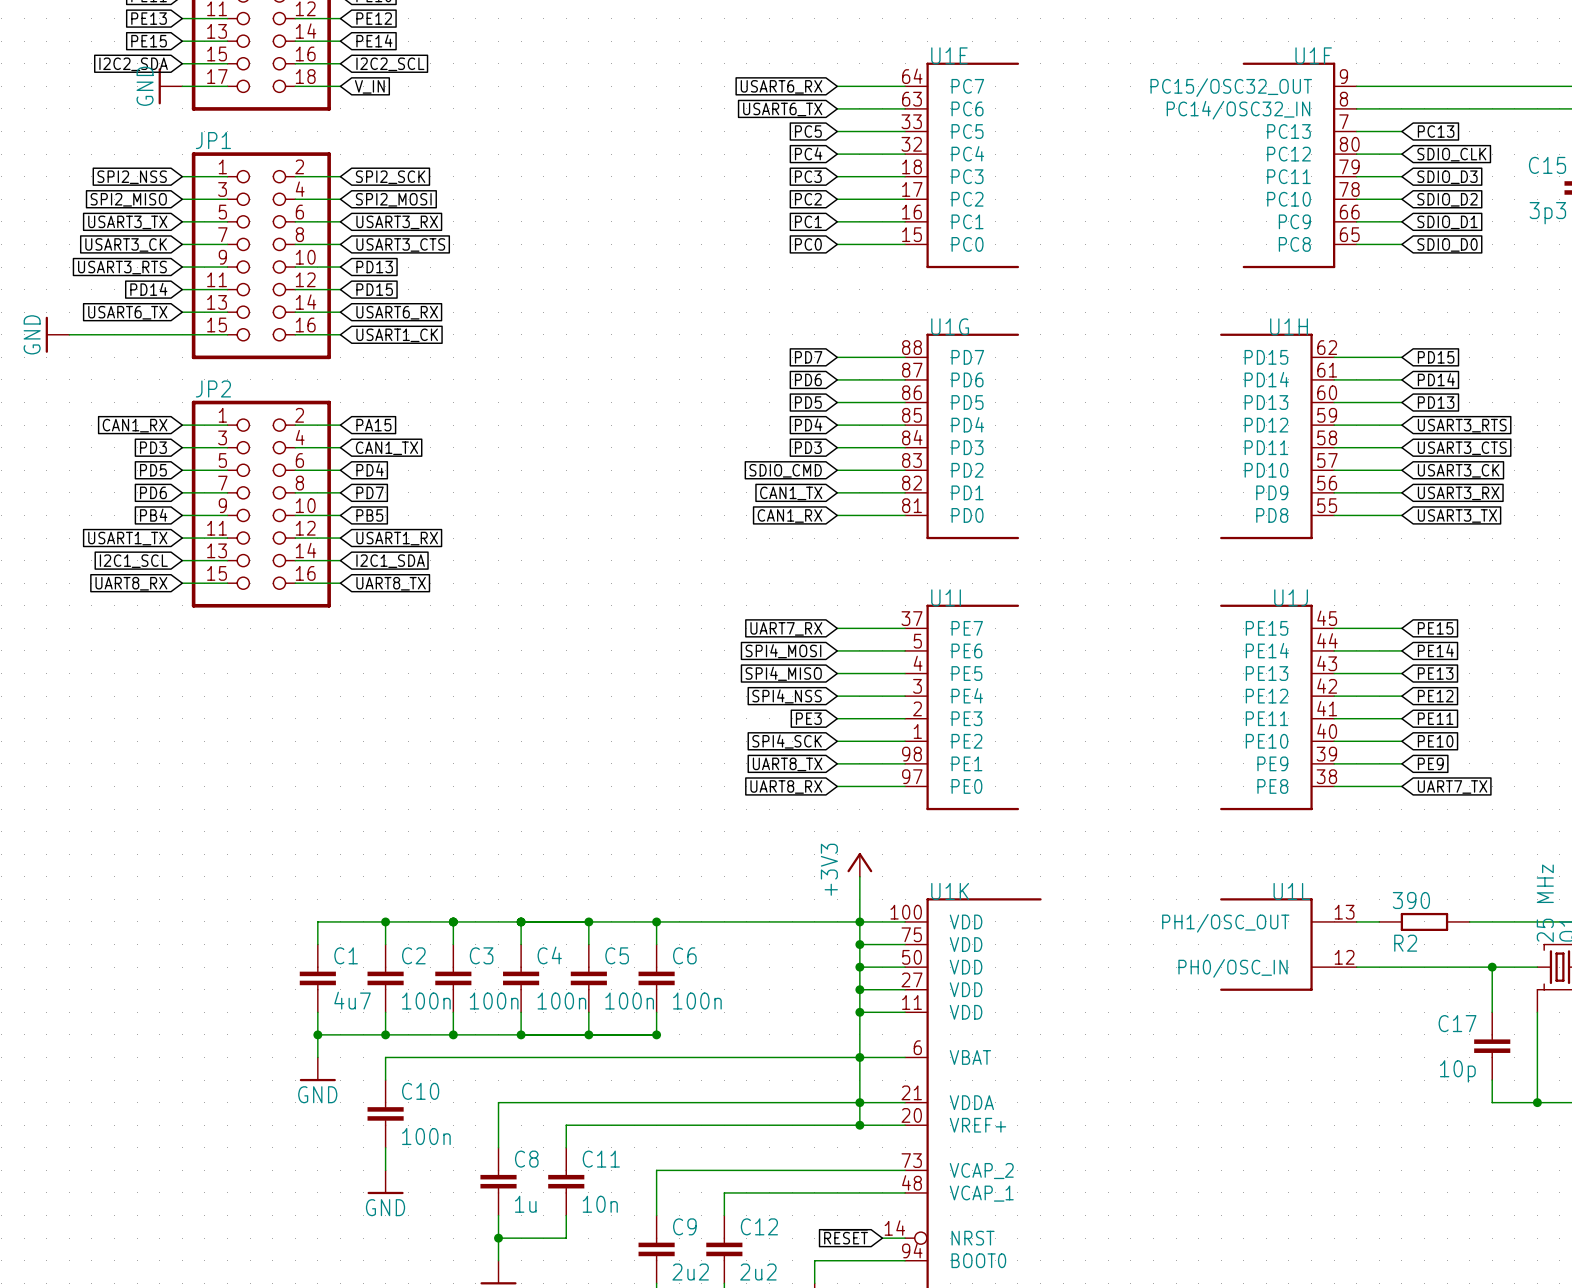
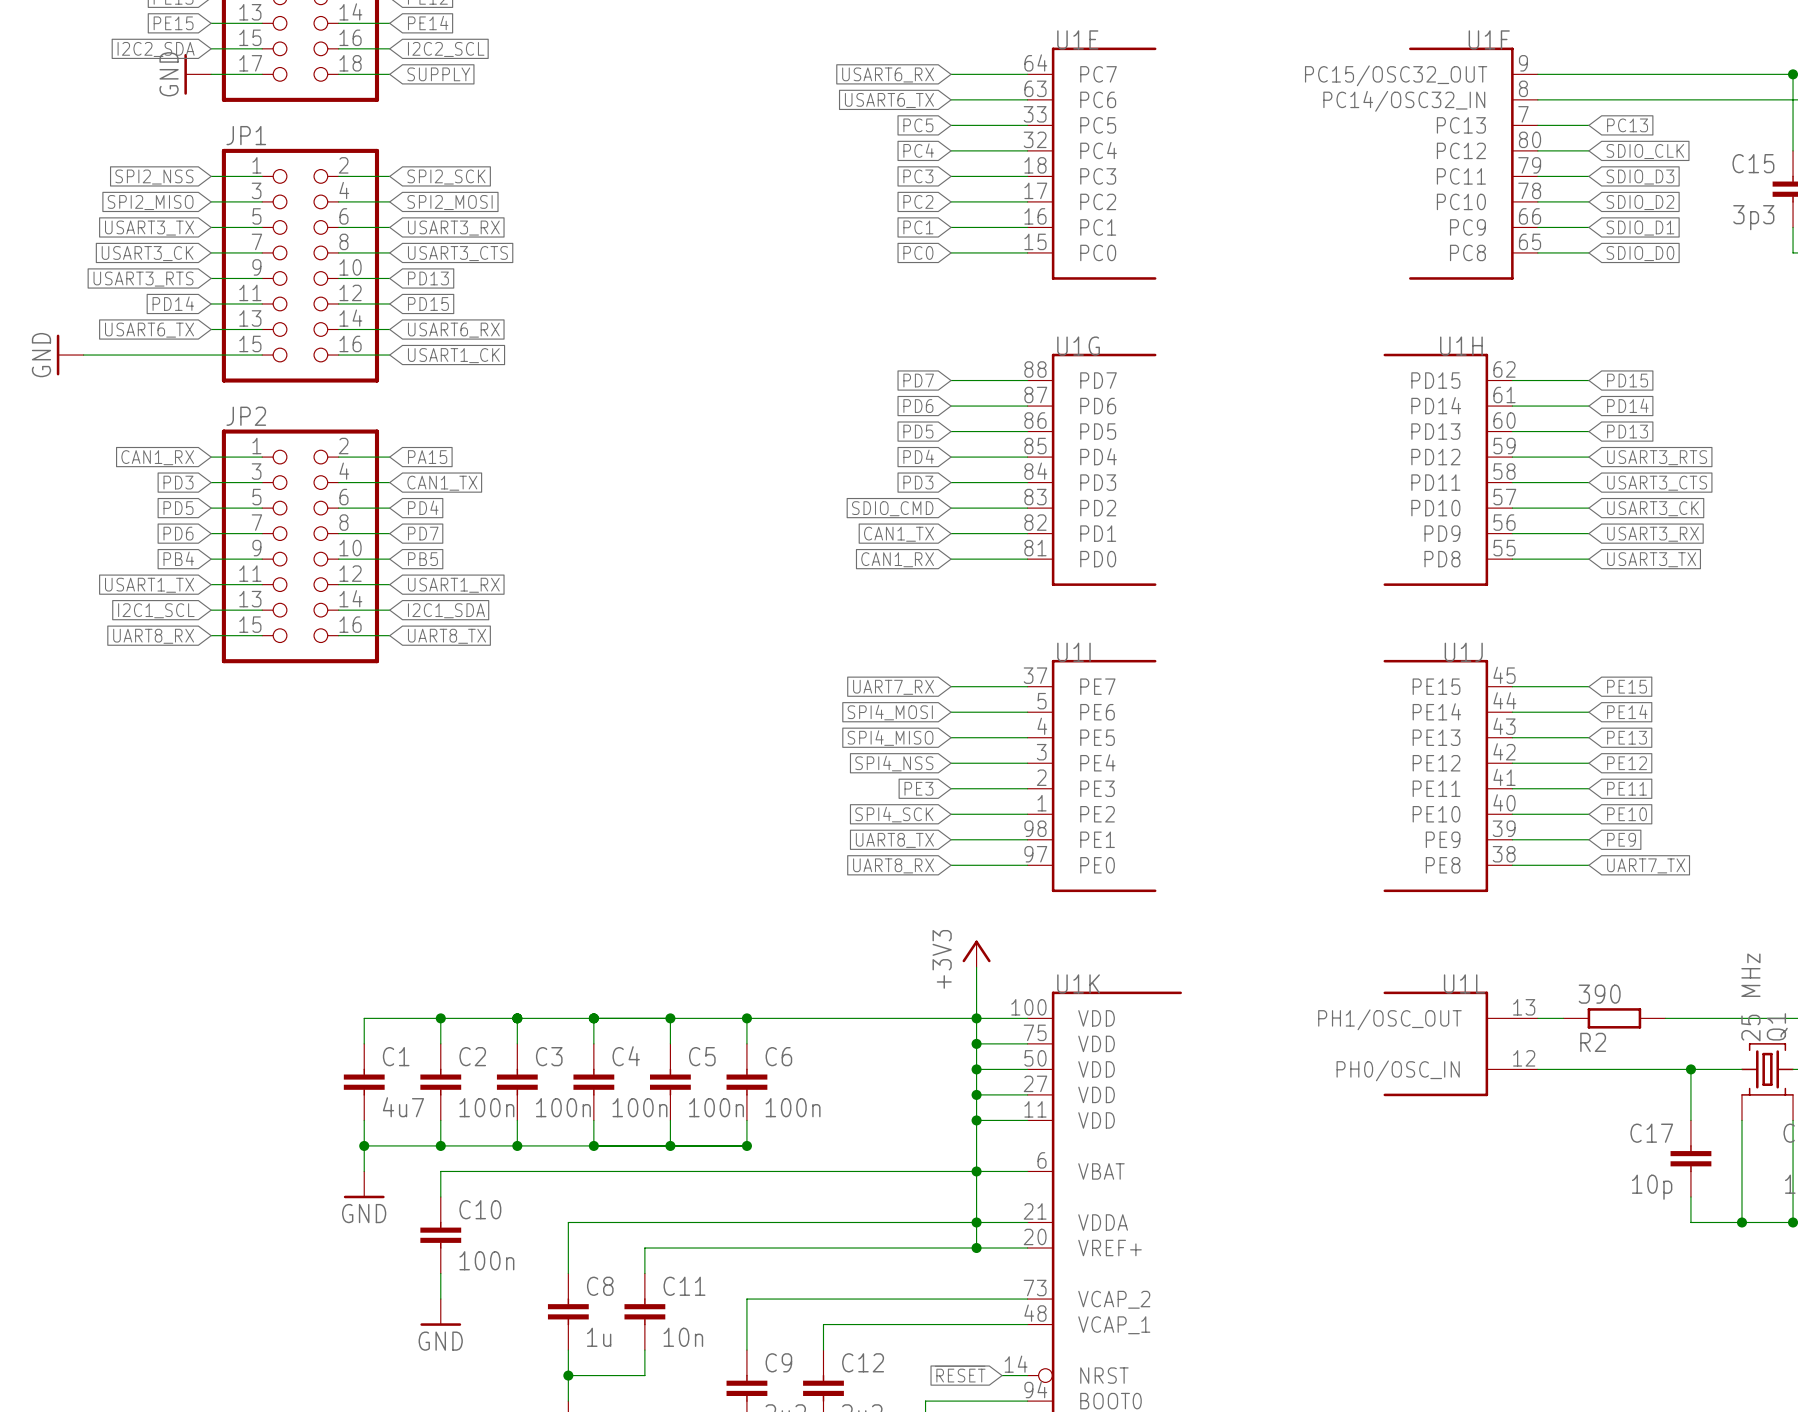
global label: V_IN (369, 86) -> SUPPLY (438, 74)

